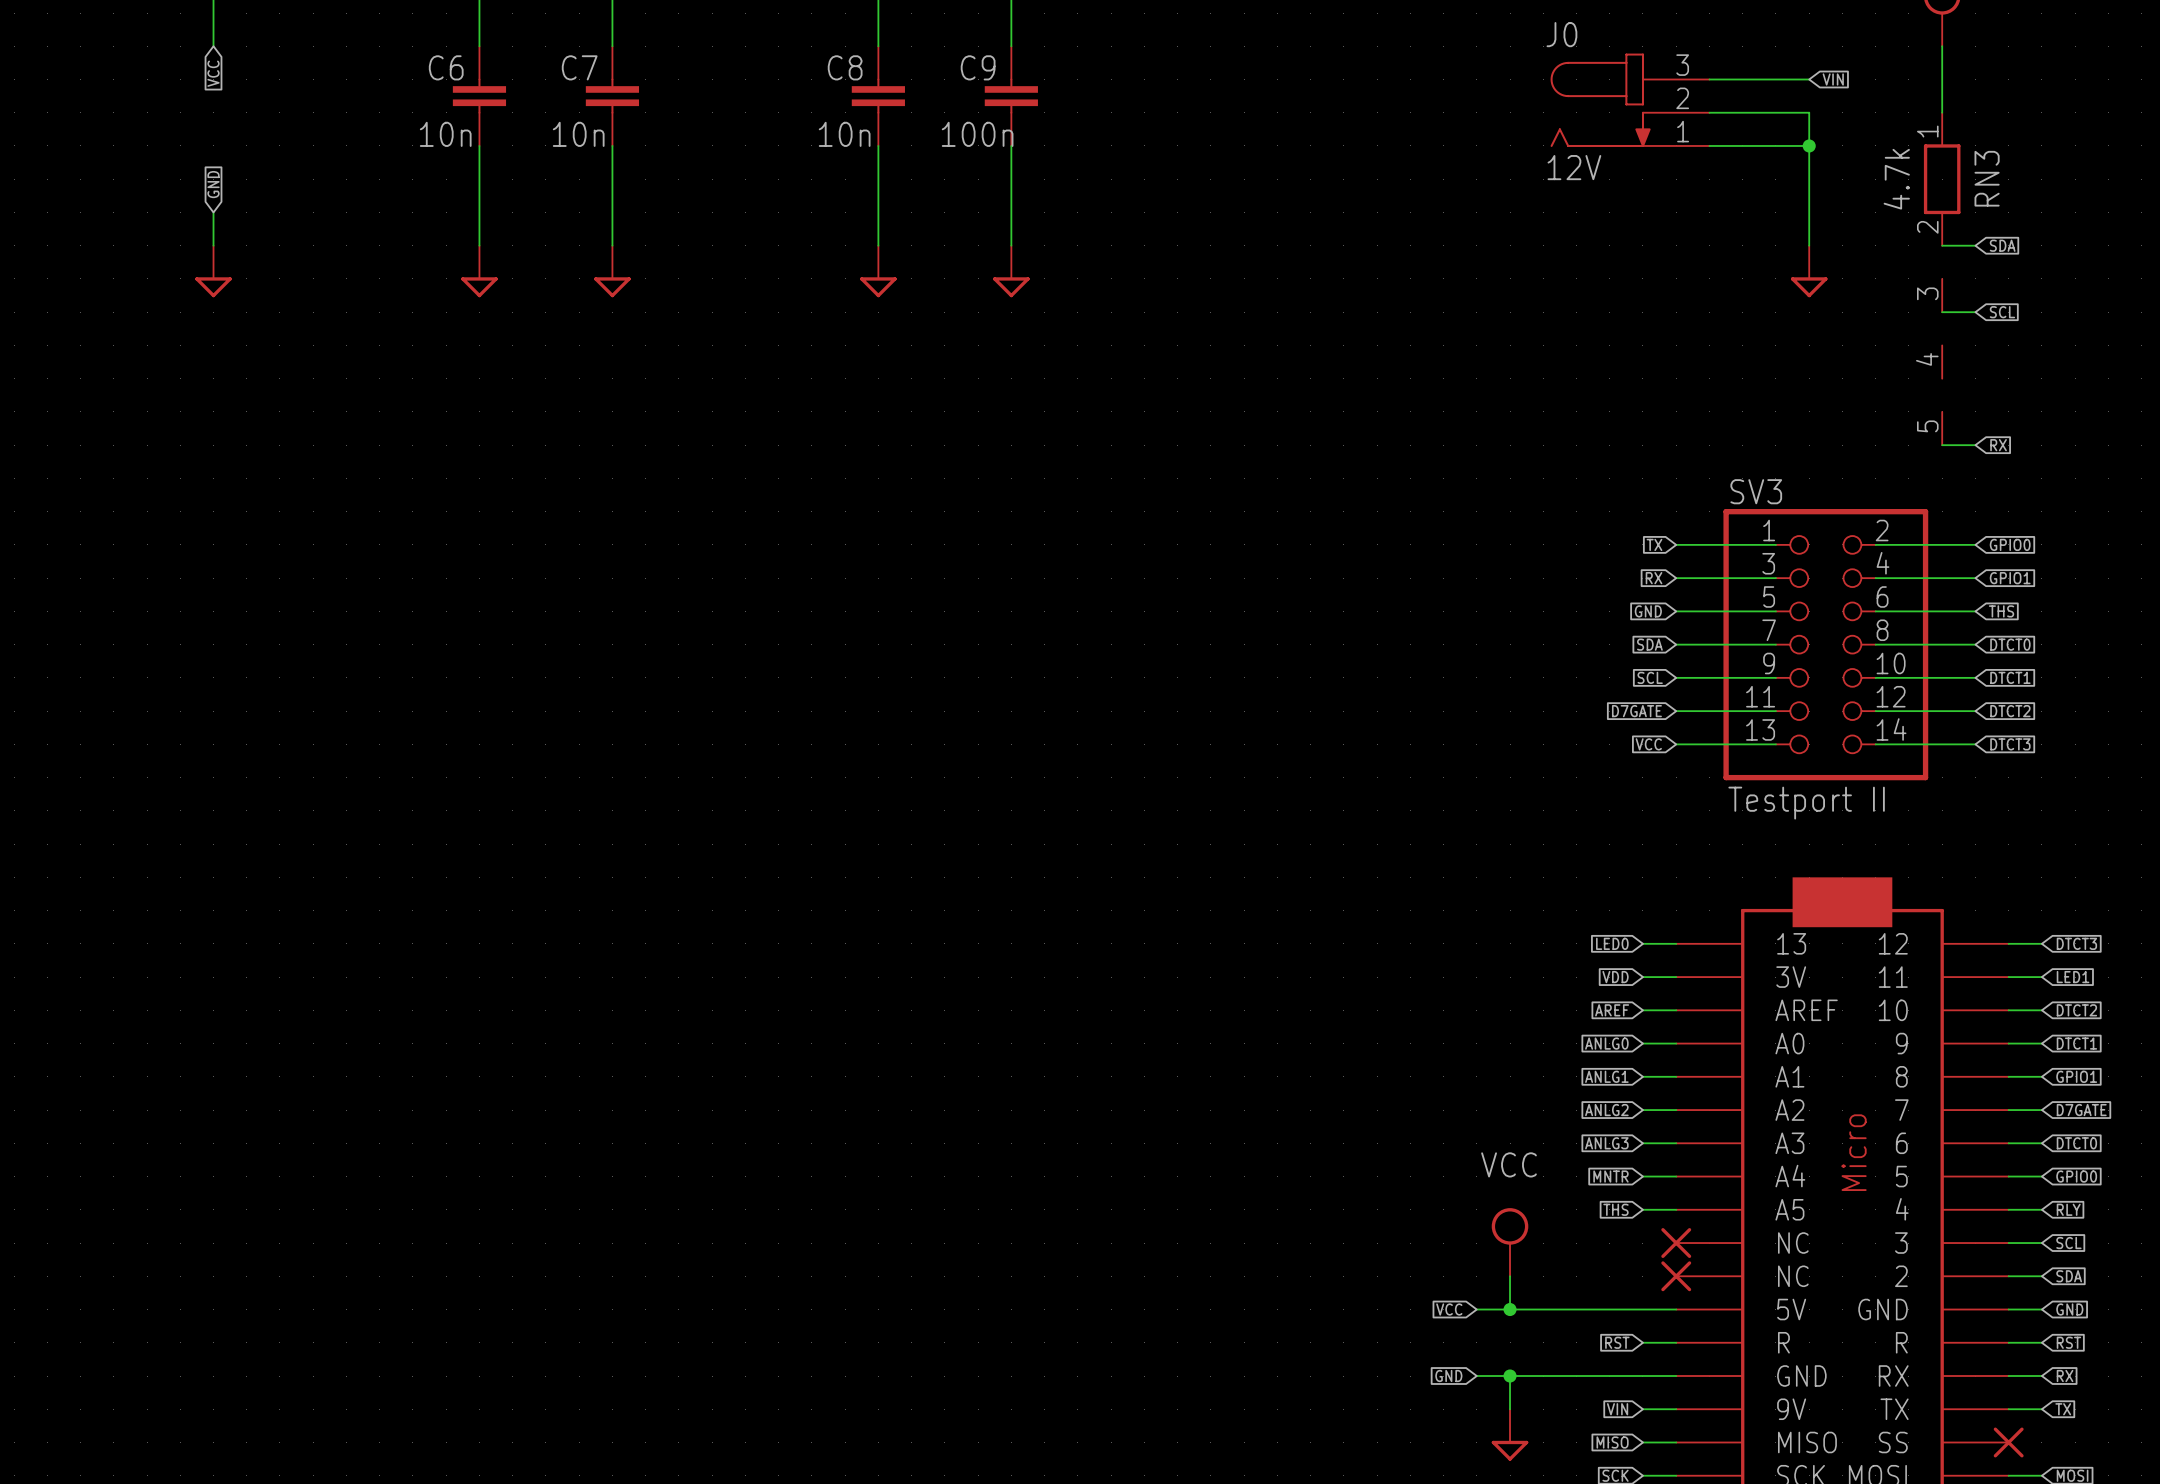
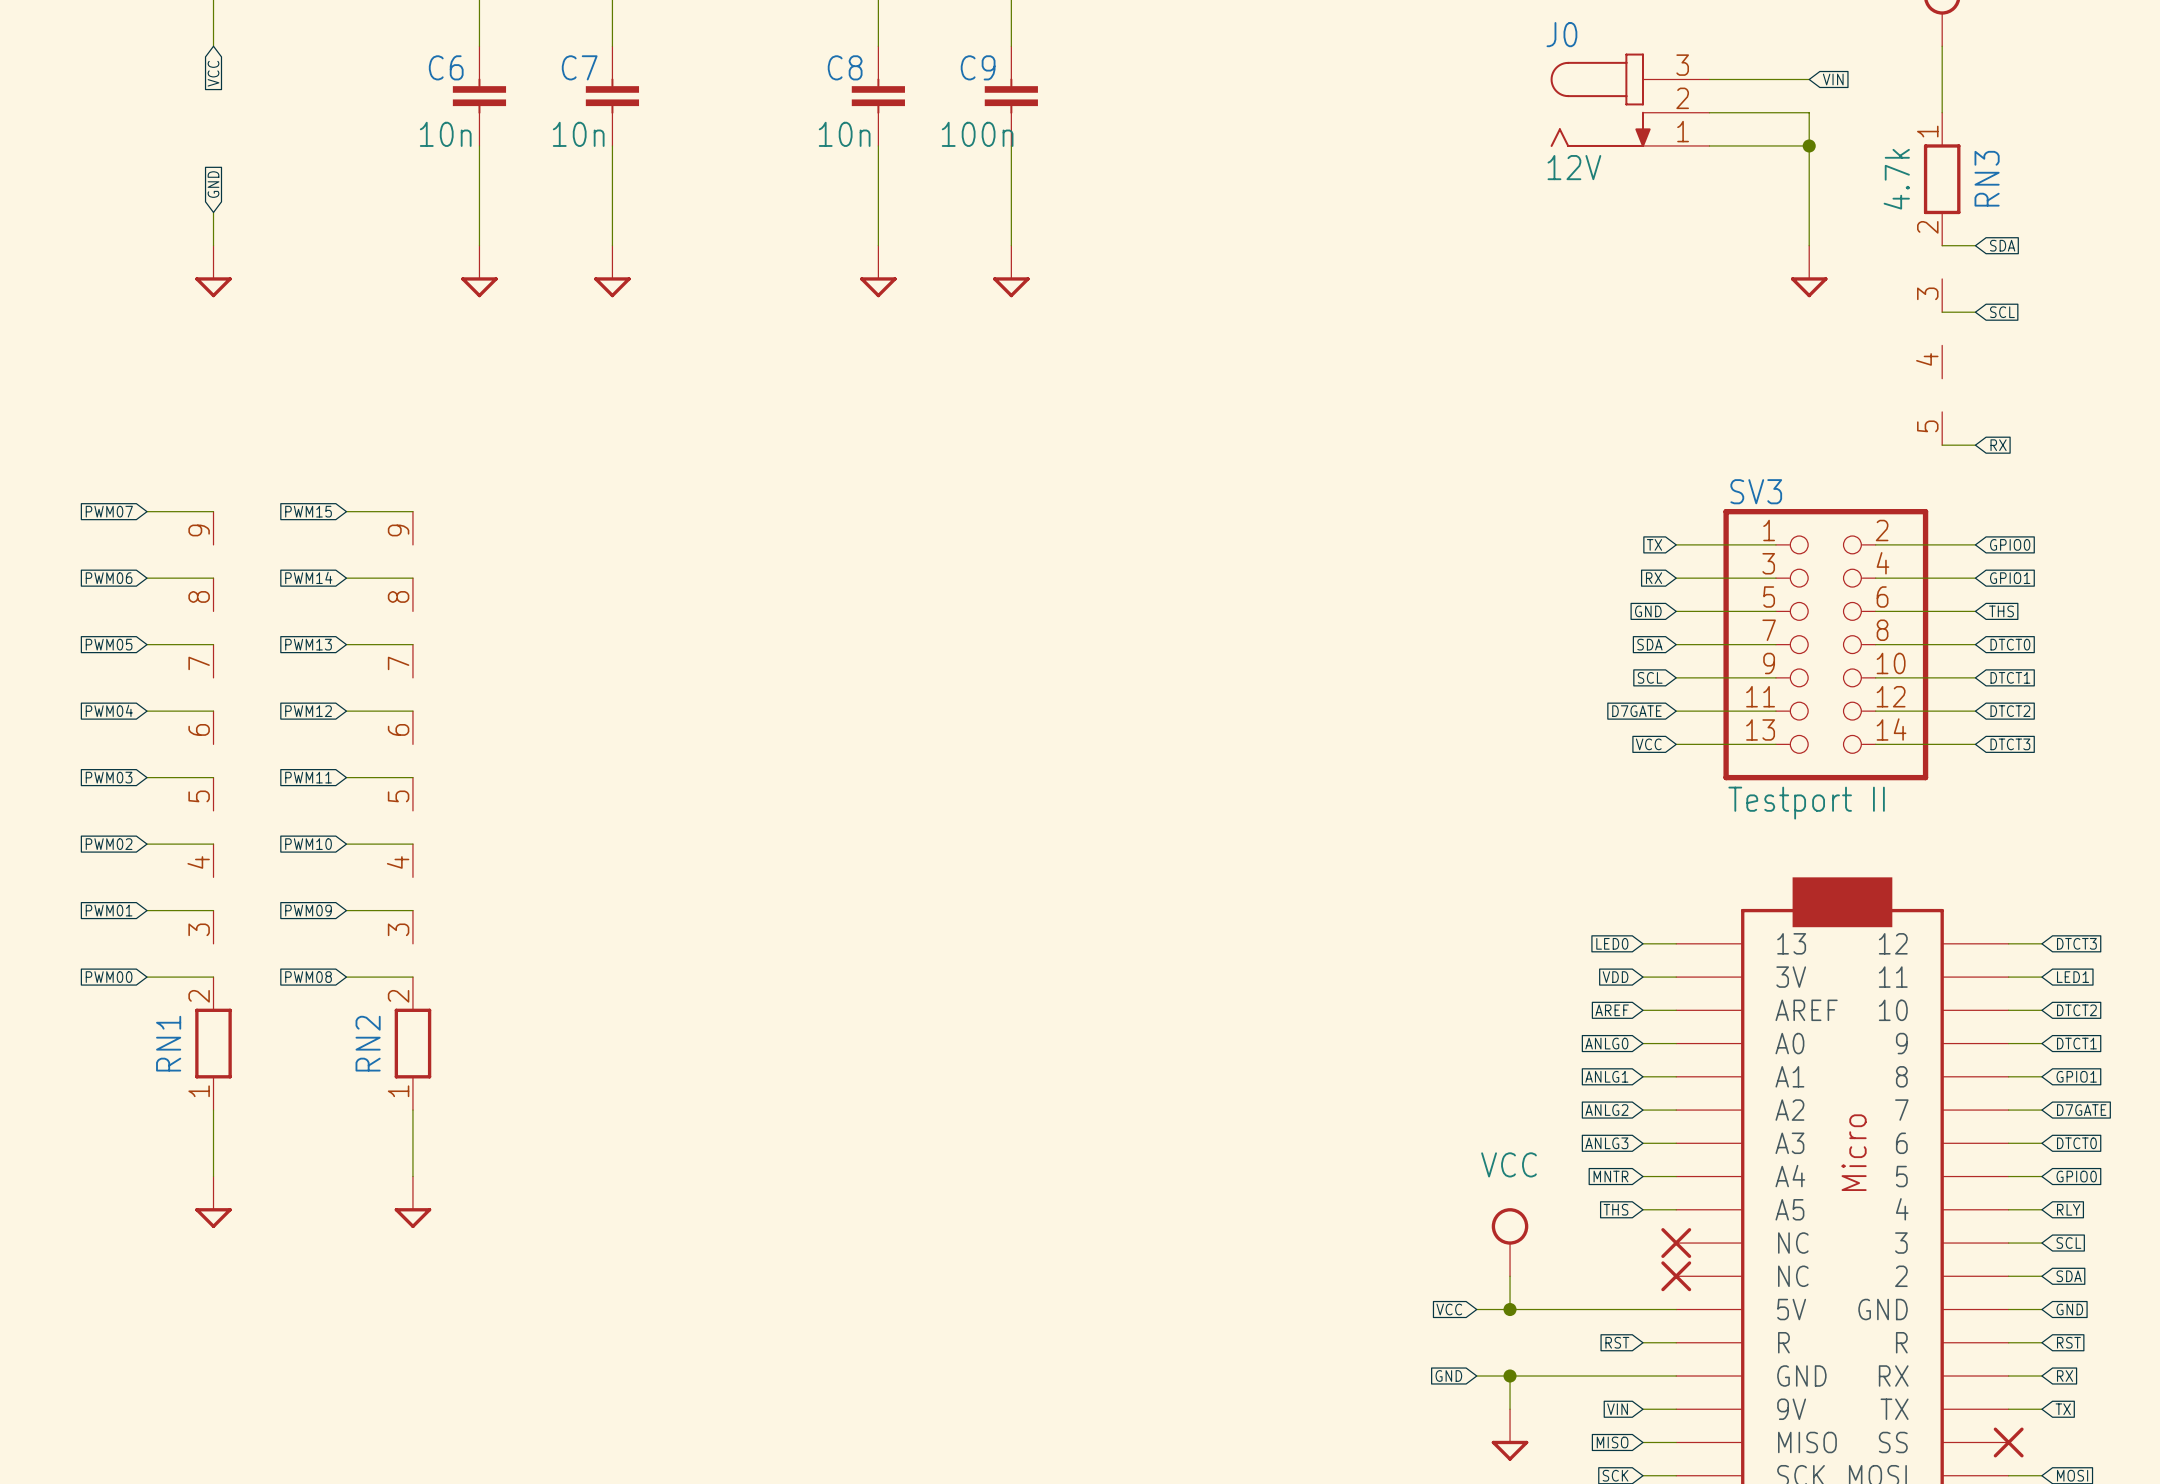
global label: none -> PWM07 (109, 511)
wire: none -> (147, 511) (213, 511)
global label: none -> PWM15 (308, 511)
wire: none -> (346, 511) (412, 511)
global label: none -> PWM14 (308, 577)
global label: none -> PWM06 (109, 578)
wire: none -> (147, 578) (213, 578)
wire: none -> (346, 578) (412, 578)
global label: none -> PWM05 (109, 644)
wire: none -> (147, 644) (213, 644)
global label: none -> PWM13 (308, 644)
wire: none -> (346, 644) (412, 644)
global label: none -> PWM04 (109, 710)
wire: none -> (147, 711) (213, 711)
global label: none -> PWM12 (308, 711)
wire: none -> (346, 711) (412, 711)
global label: none -> PWM03 (109, 777)
wire: none -> (147, 777) (213, 777)
global label: none -> PWM11 (308, 777)
wire: none -> (346, 777) (412, 777)
RN1: none -> (213, 810)
RN2: none -> (412, 810)
global label: none -> PWM02 (109, 844)
wire: none -> (147, 844) (213, 844)
global label: none -> PWM10 (308, 844)
wire: none -> (346, 844) (412, 844)
global label: none -> PWM01 (109, 910)
wire: none -> (147, 910) (213, 910)
global label: none -> PWM09 (308, 910)
wire: none -> (346, 910) (412, 910)
global label: none -> PWM00 (109, 977)
wire: none -> (147, 977) (213, 977)
global label: none -> PWM08 (308, 977)
wire: none -> (346, 977) (412, 977)
wire: none -> (213, 1110) (213, 1176)
wire: none -> (412, 1110) (412, 1176)
power symbol: none -> (213, 1202)
power symbol: none -> (412, 1202)

